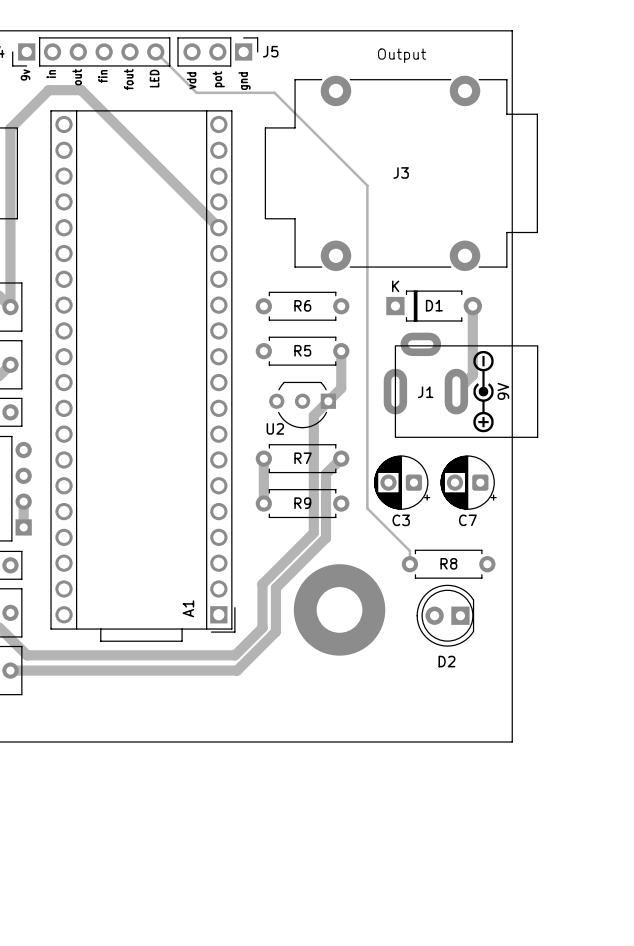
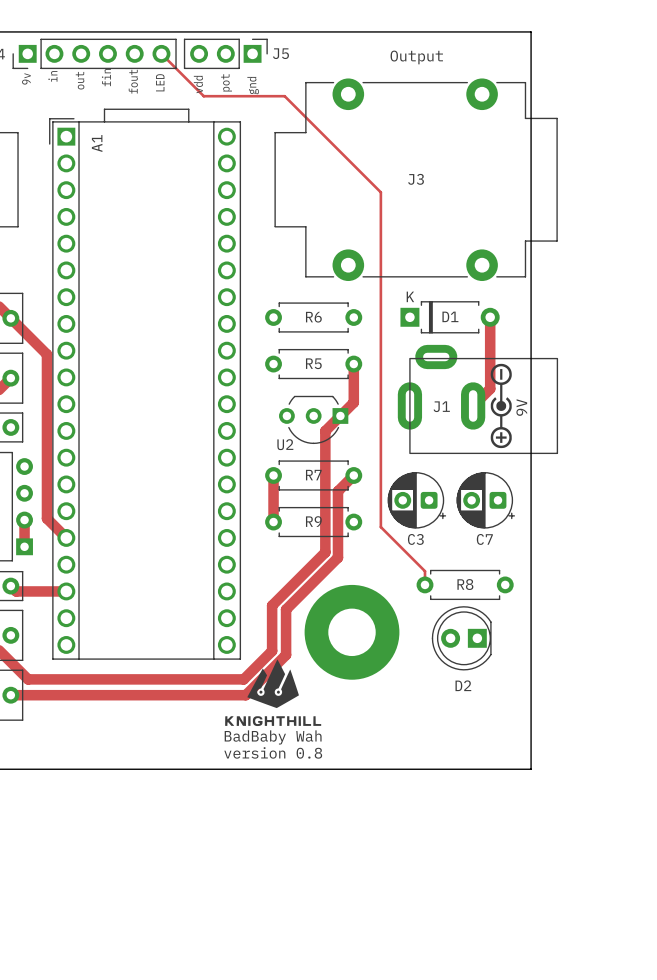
track: (218, 227) (81, 90) (48, 90) (10, 128) (10, 307) -> (66, 537) (46, 518) (46, 354) (10, 318)
A1 rotation: 0° (142, 376) -> 180° (145, 384)
track: none -> (10, 586) (16, 591) (66, 591)
drawing: none -> [225, 659, 322, 727]
text: none -> BadBaby Wah (273, 737)
text: none -> version 0.8 (273, 752)

